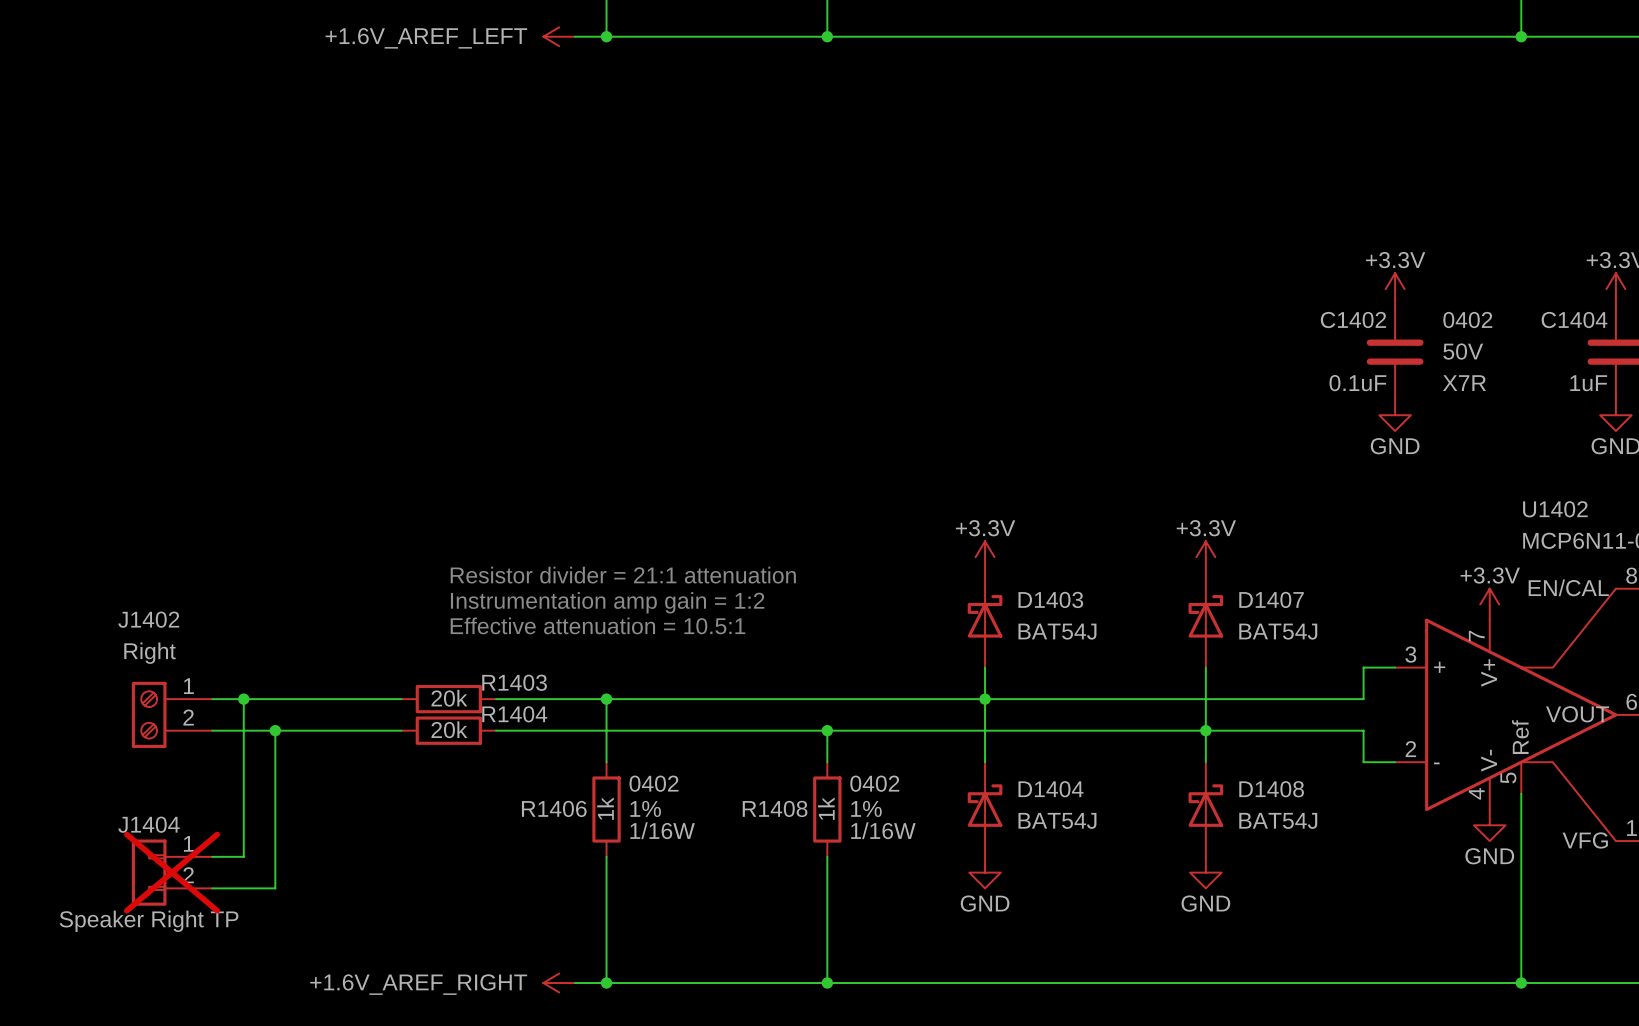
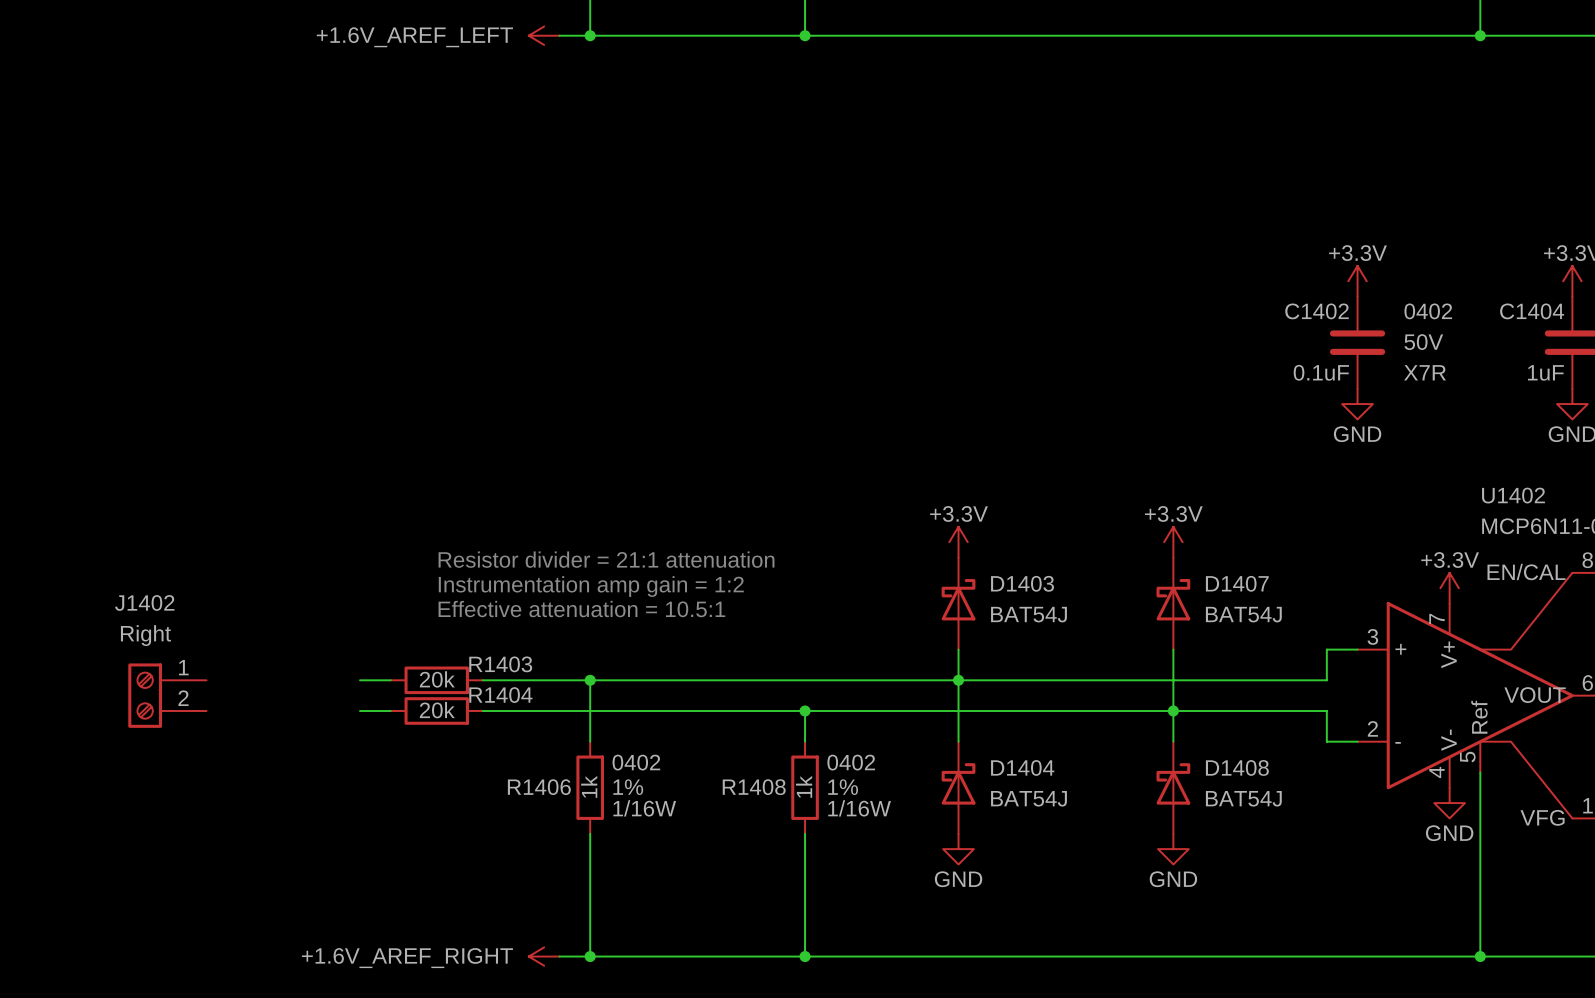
wire: (212, 699) (369, 699) -> none
wire: (243, 699) (243, 856) (212, 856) -> none
junction: (243, 699) -> none
wire: (212, 730) (369, 730) -> none
wire: (275, 730) (275, 888) (212, 888) -> none
junction: (275, 730) -> none
J1404: Speaker Right TP (172, 872) -> none

